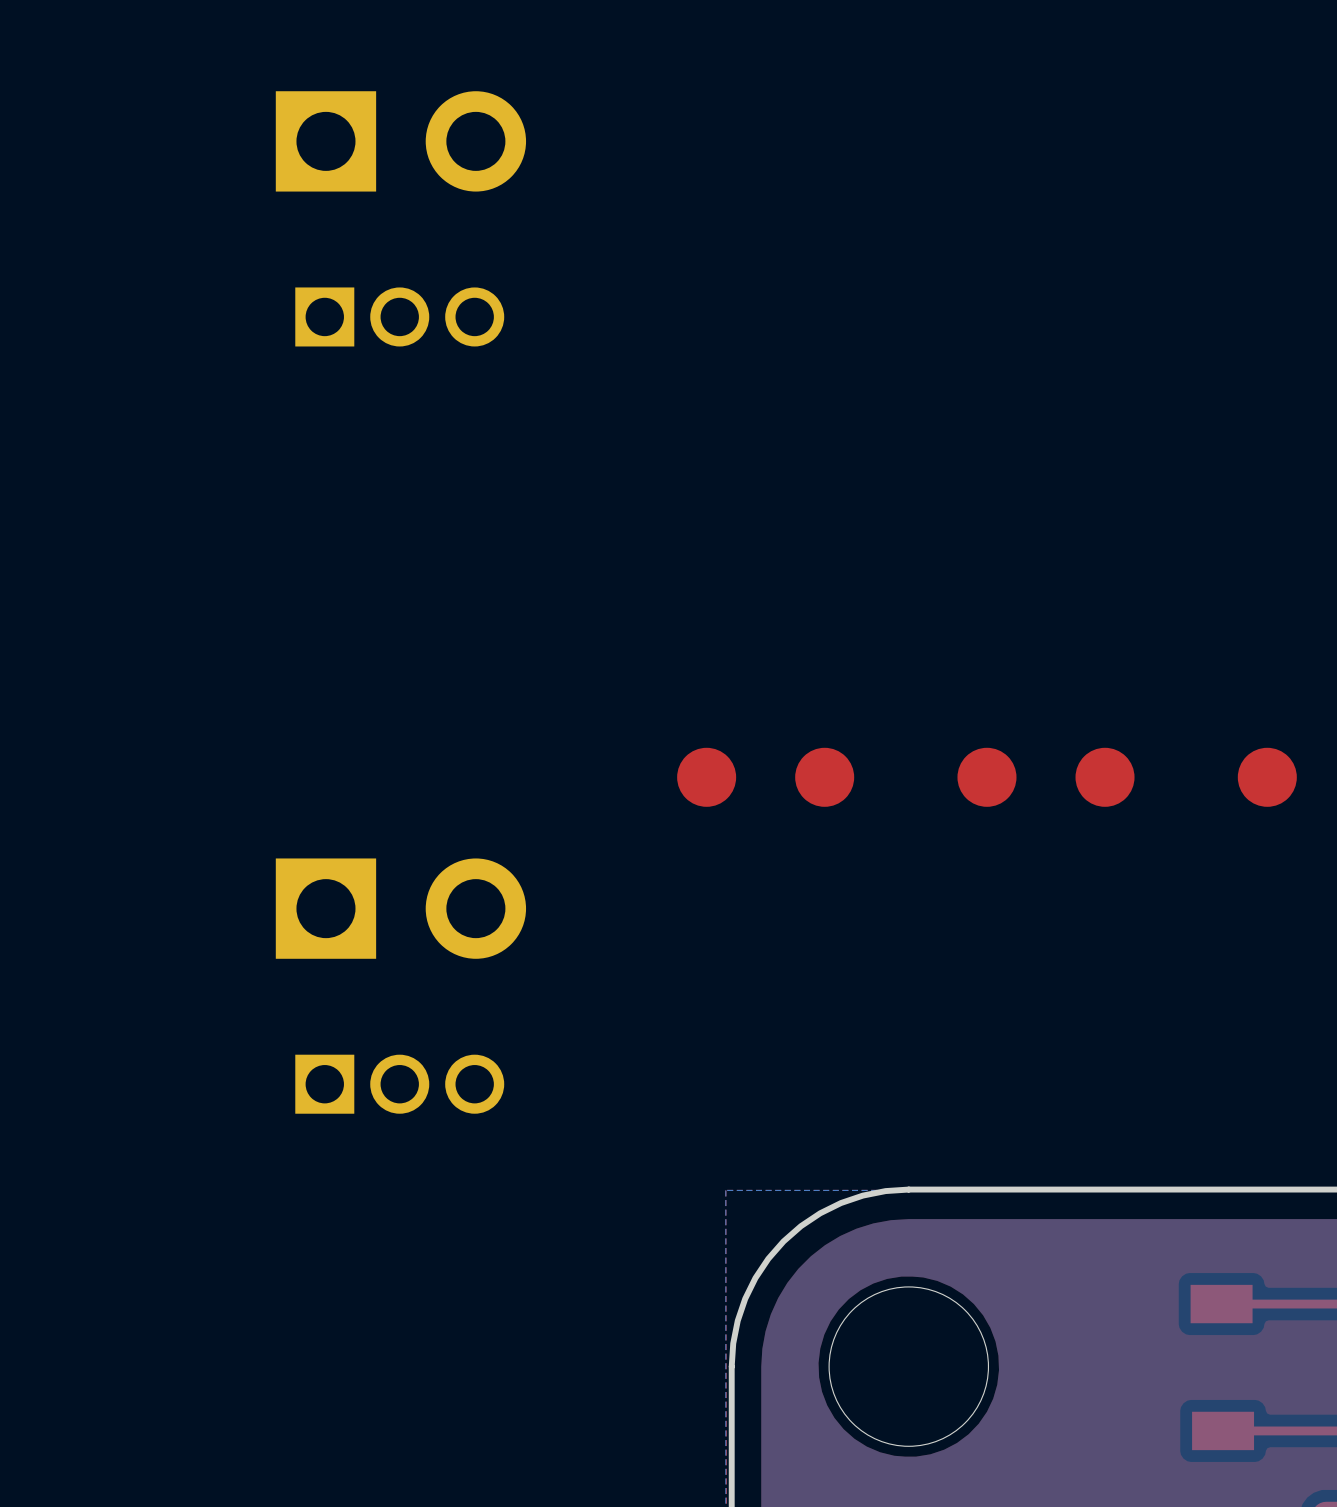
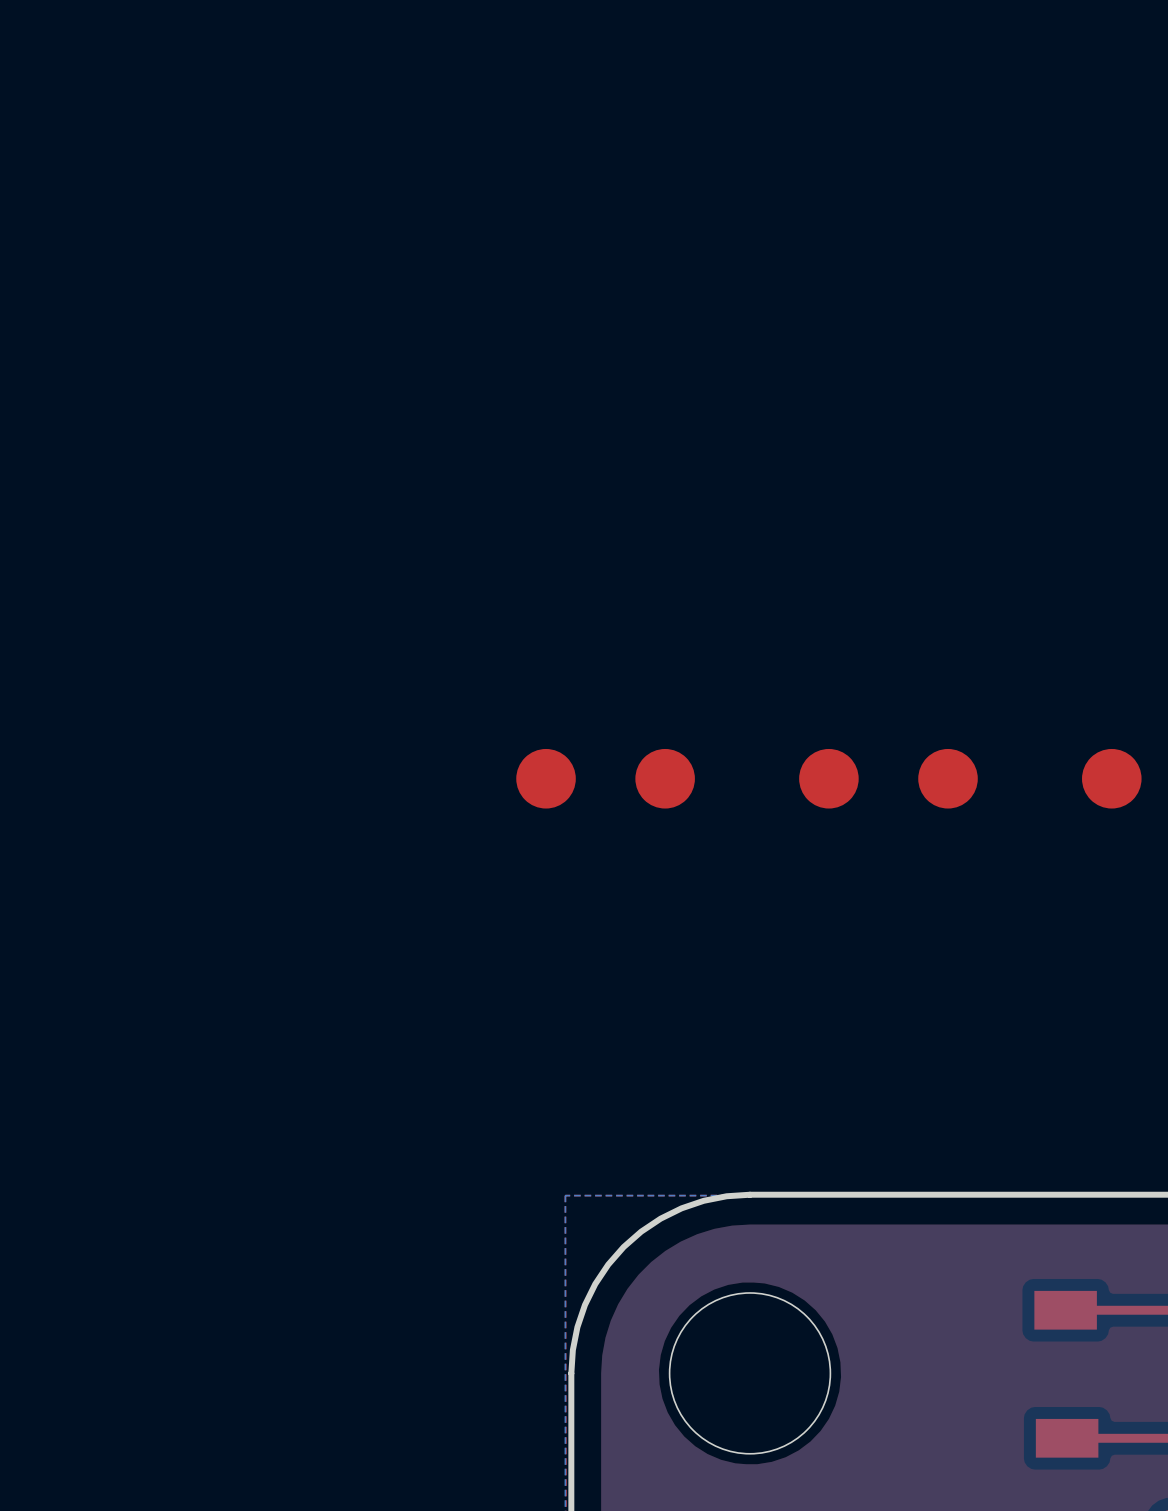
part: (400, 141) -> none
part: (399, 316) -> none
part: (400, 908) -> none
part: (399, 1084) -> none

